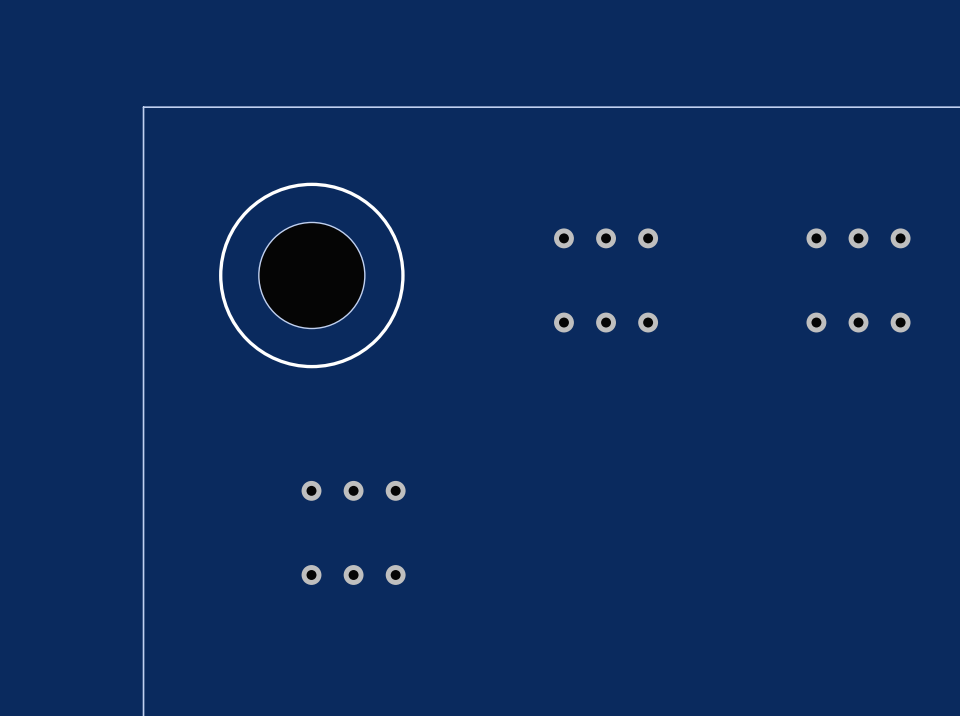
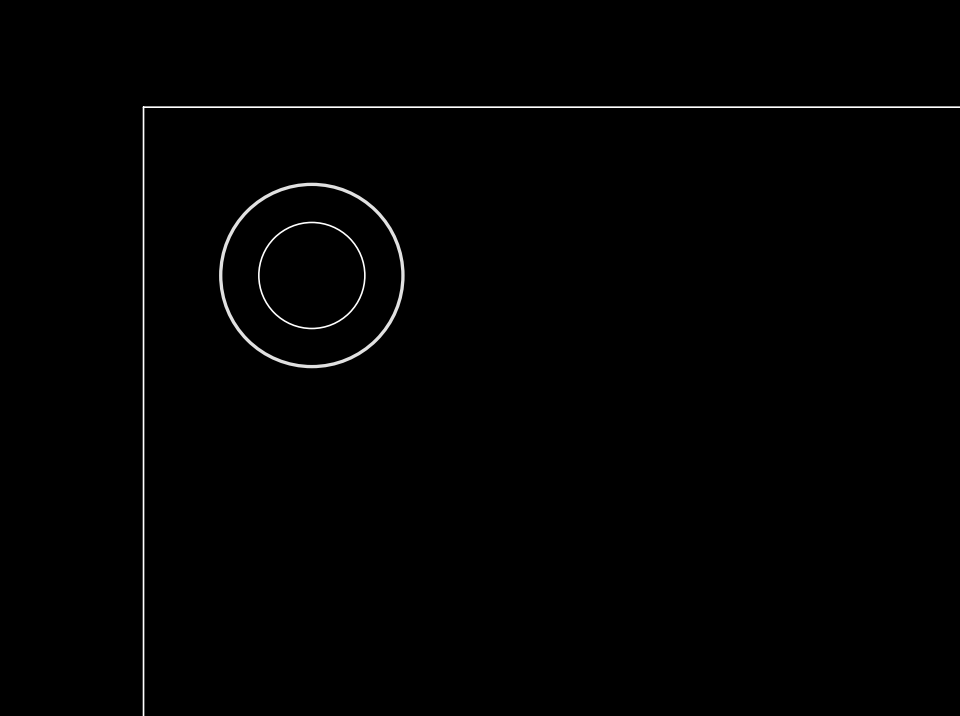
via: (563, 238) -> none
via: (606, 238) -> none
via: (648, 238) -> none
via: (816, 238) -> none
via: (858, 238) -> none
via: (900, 238) -> none
via: (563, 322) -> none
via: (606, 322) -> none
via: (648, 322) -> none
via: (816, 322) -> none
via: (858, 322) -> none
via: (900, 322) -> none
via: (311, 490) -> none
via: (353, 490) -> none
via: (395, 490) -> none
via: (311, 575) -> none
via: (353, 575) -> none
via: (395, 575) -> none

